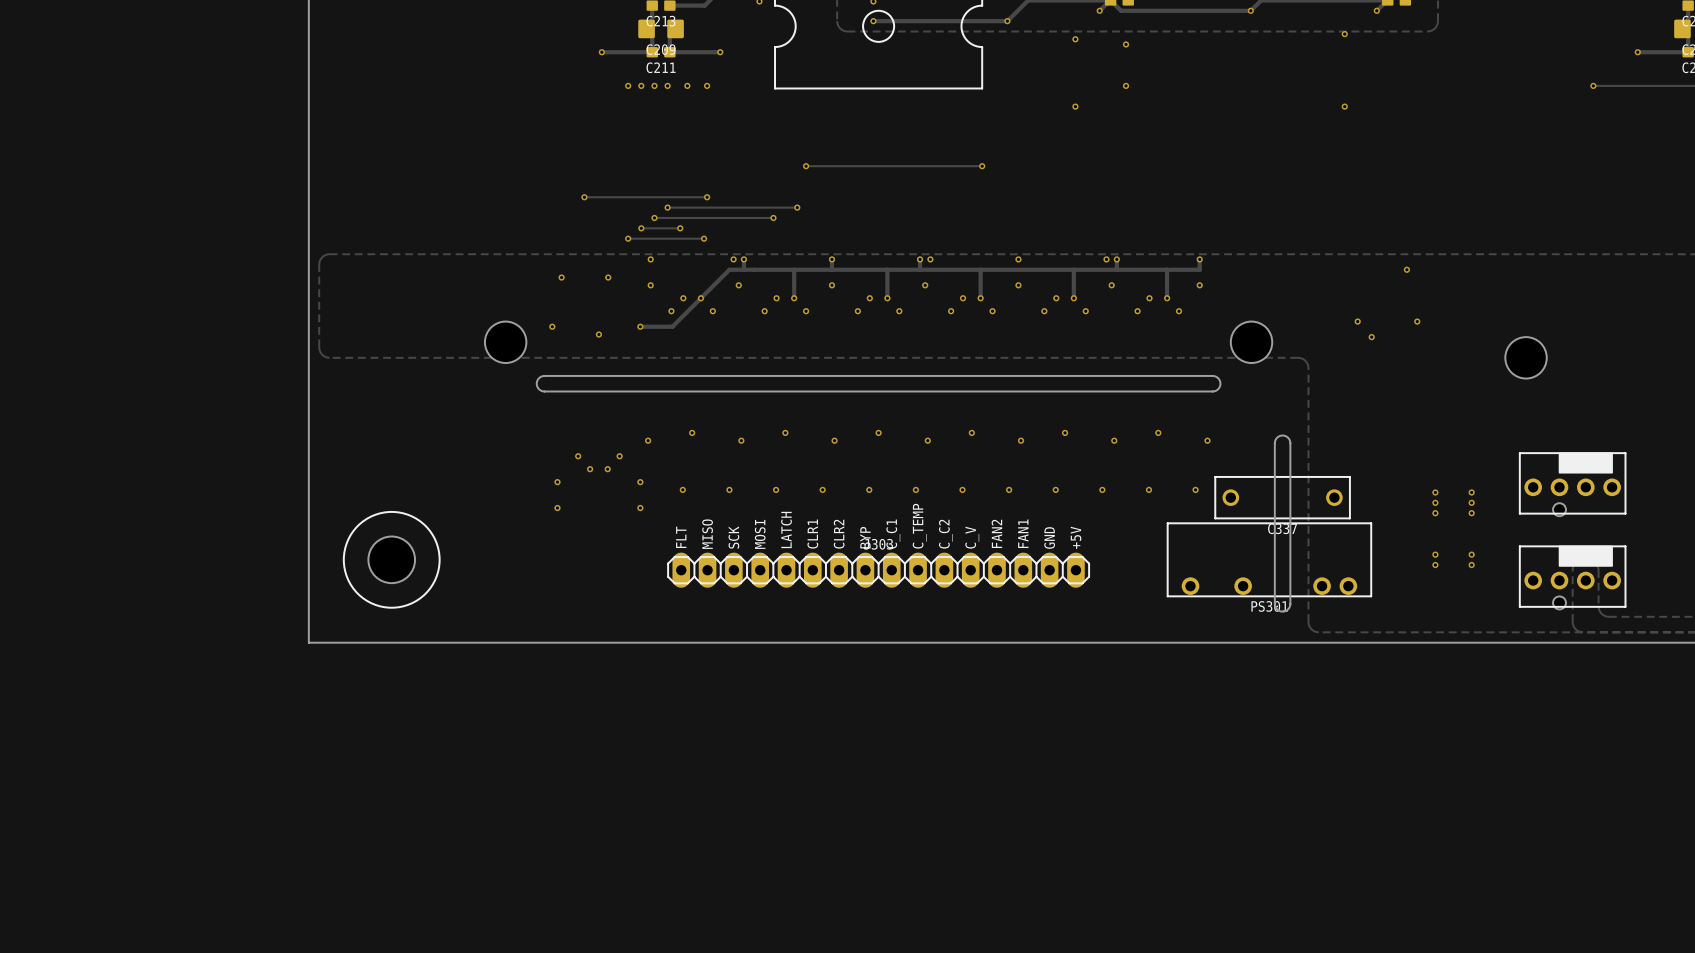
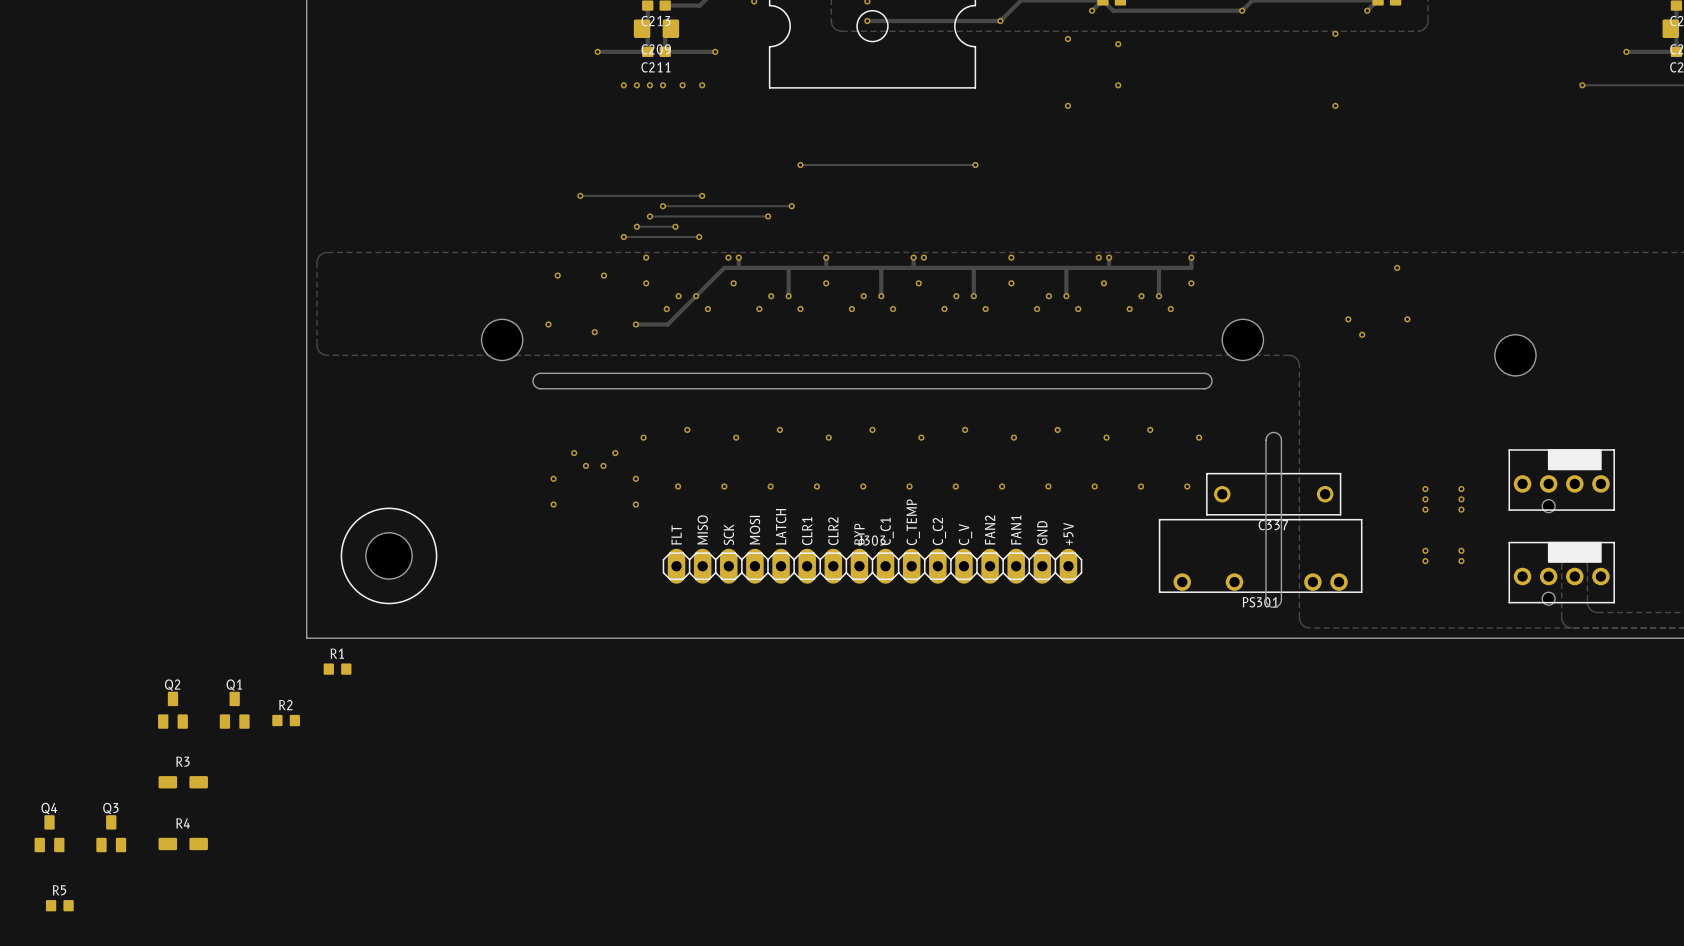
R1: none -> (337, 669)
Q2: none -> (172, 710)
Q1: none -> (234, 710)
R2: none -> (286, 720)
R3: none -> (183, 782)
Q4: none -> (49, 833)
Q3: none -> (111, 833)
R4: none -> (183, 843)
R5: none -> (59, 905)

